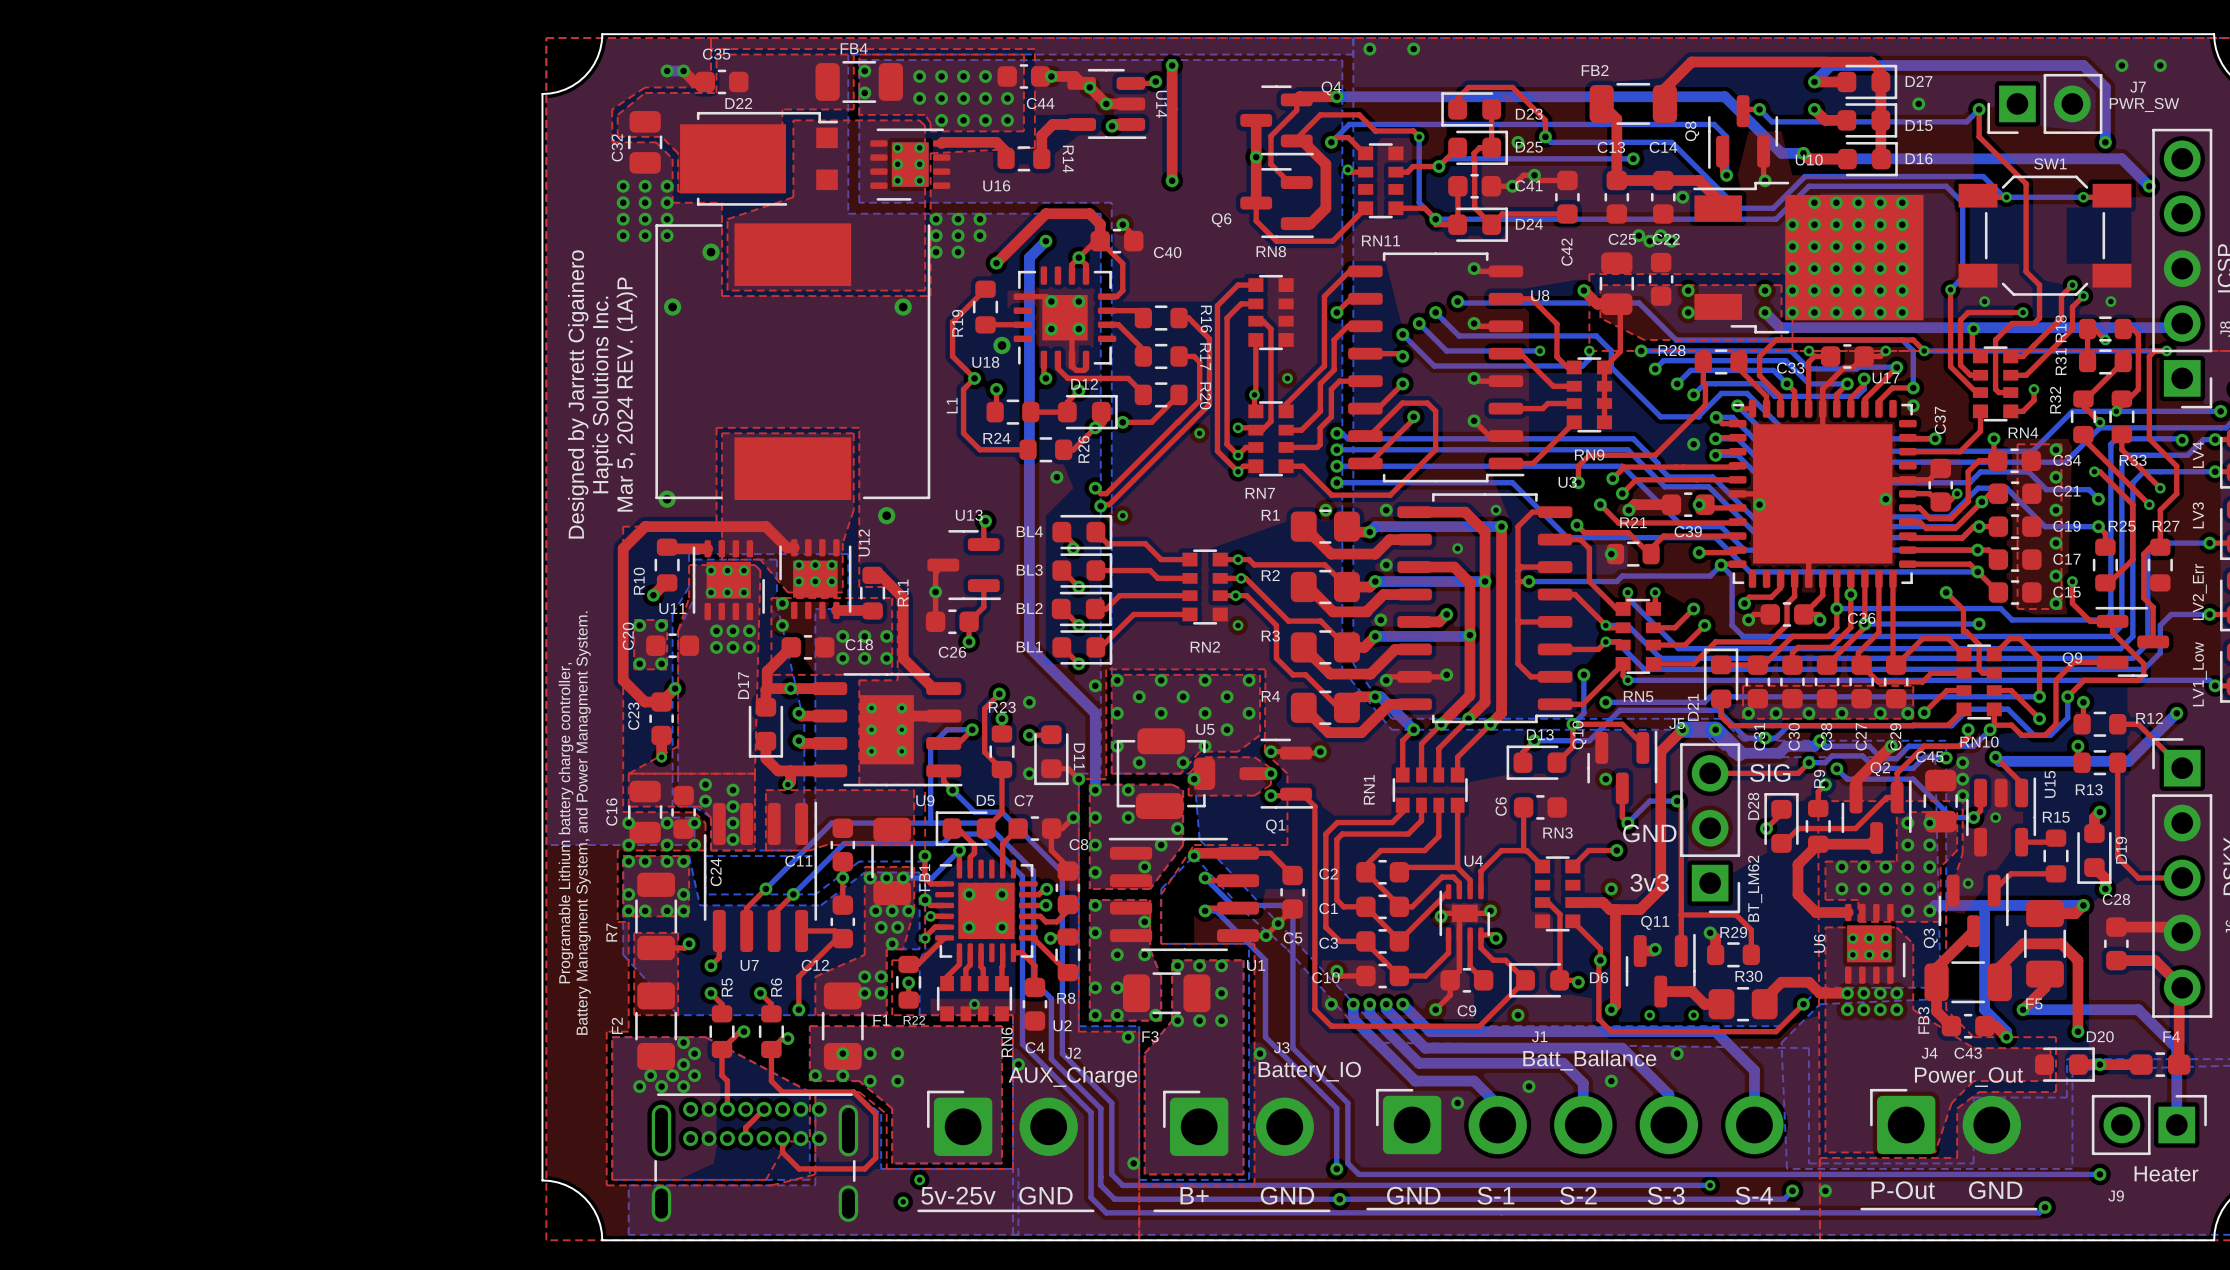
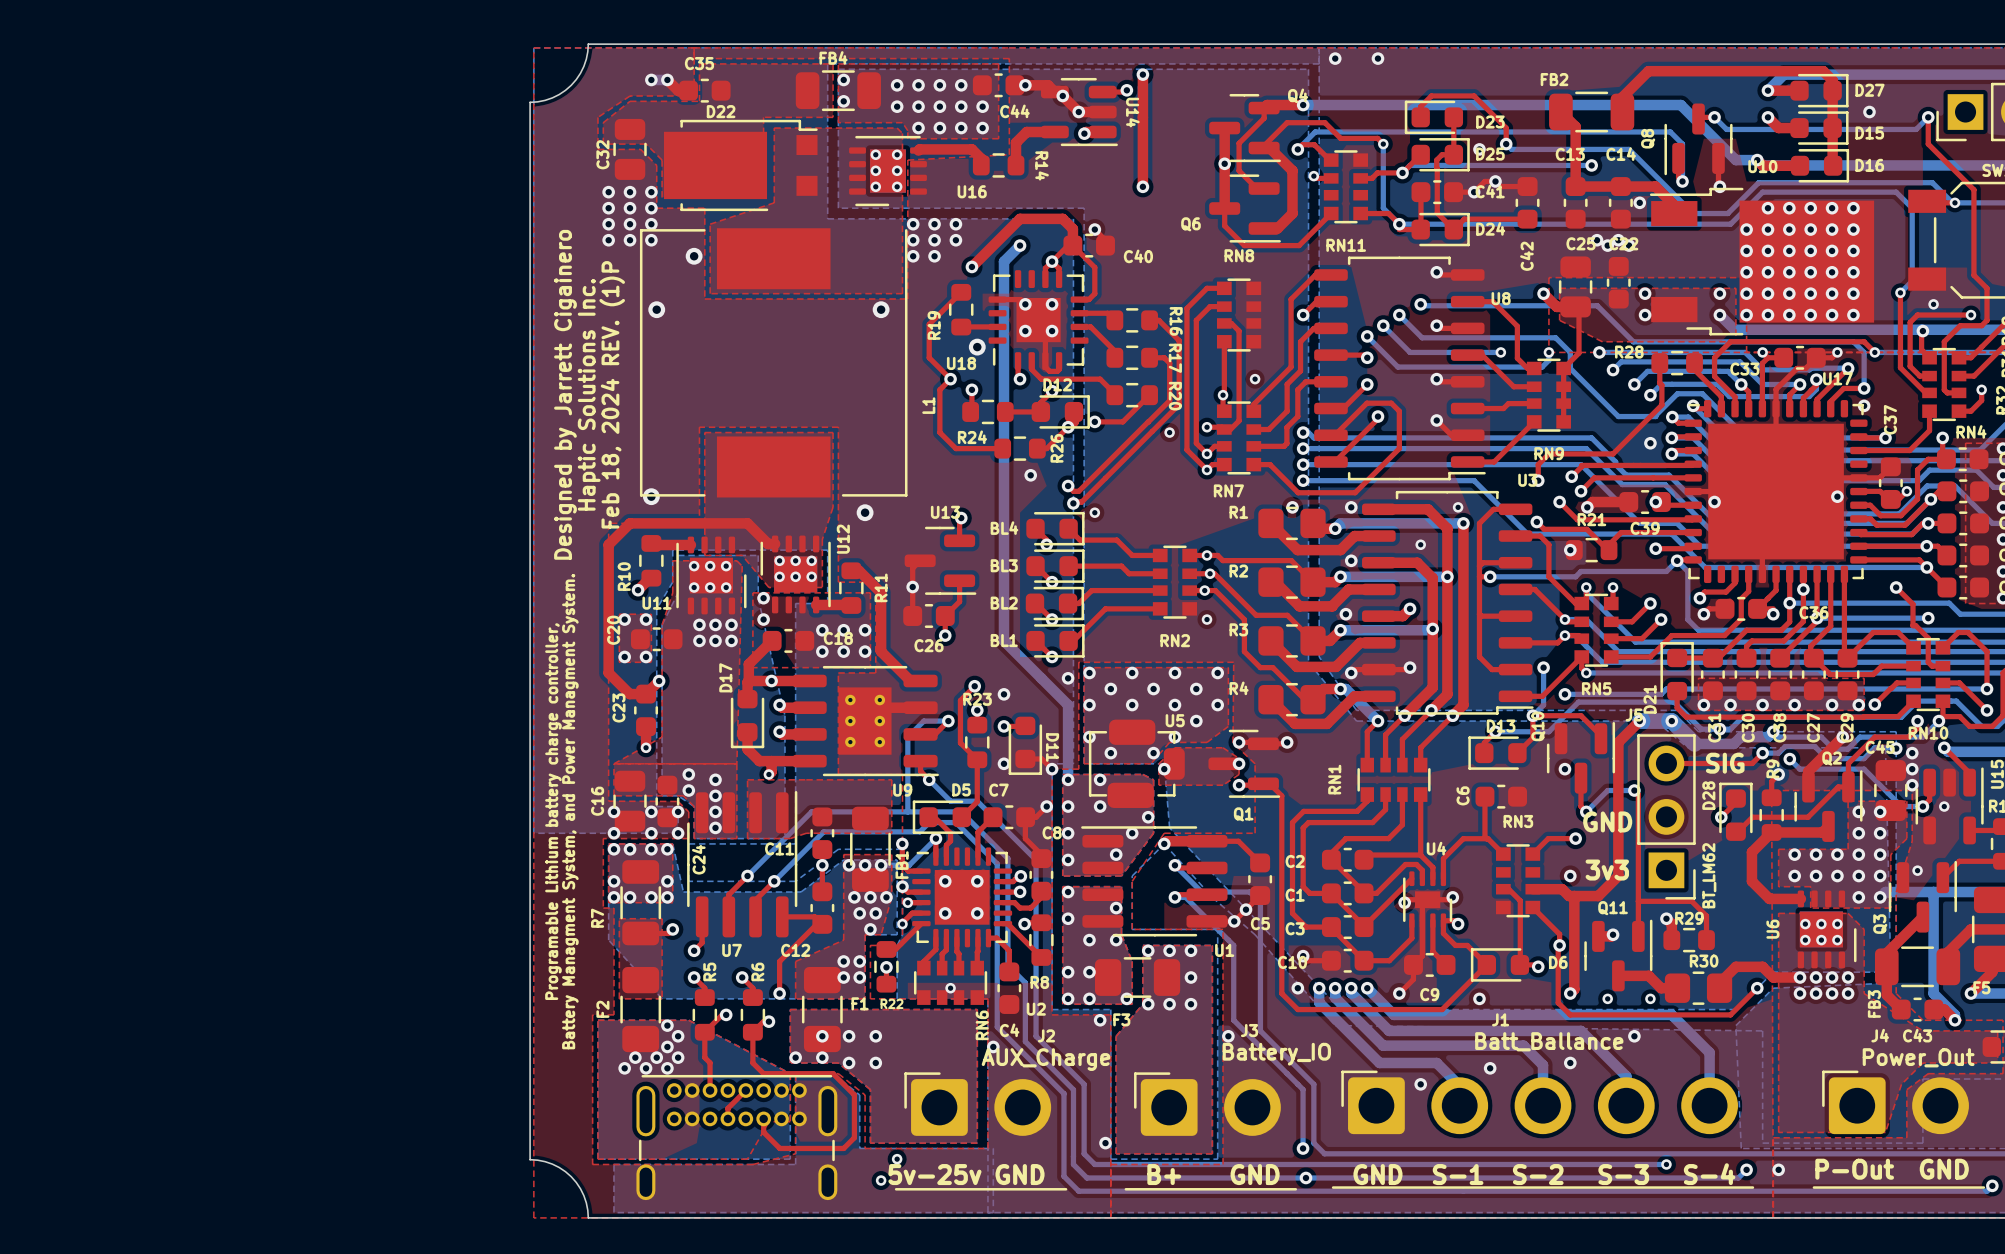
text: Mar 5, 2024 REV. (1A)P (626, 394) -> Feb 18, 2024 REV. (1)P (612, 394)

